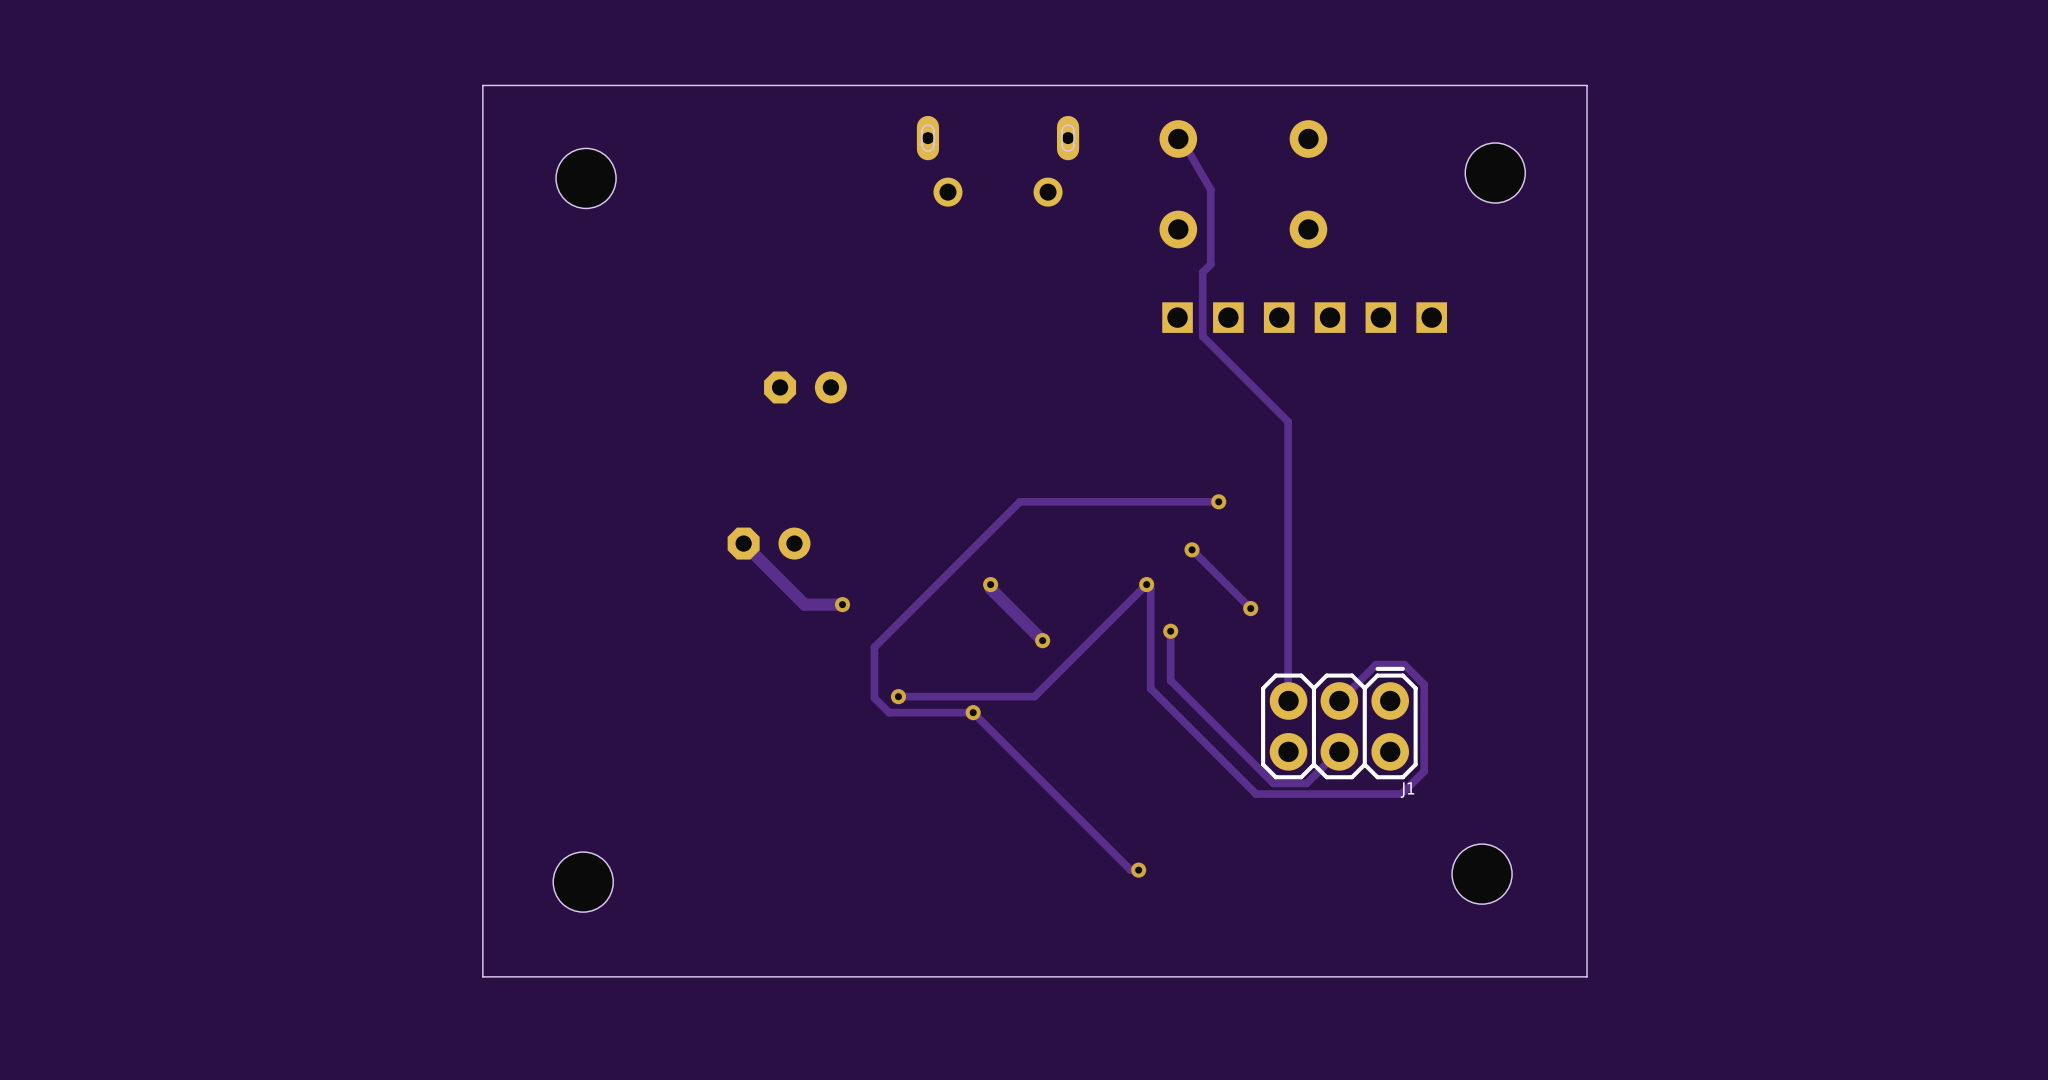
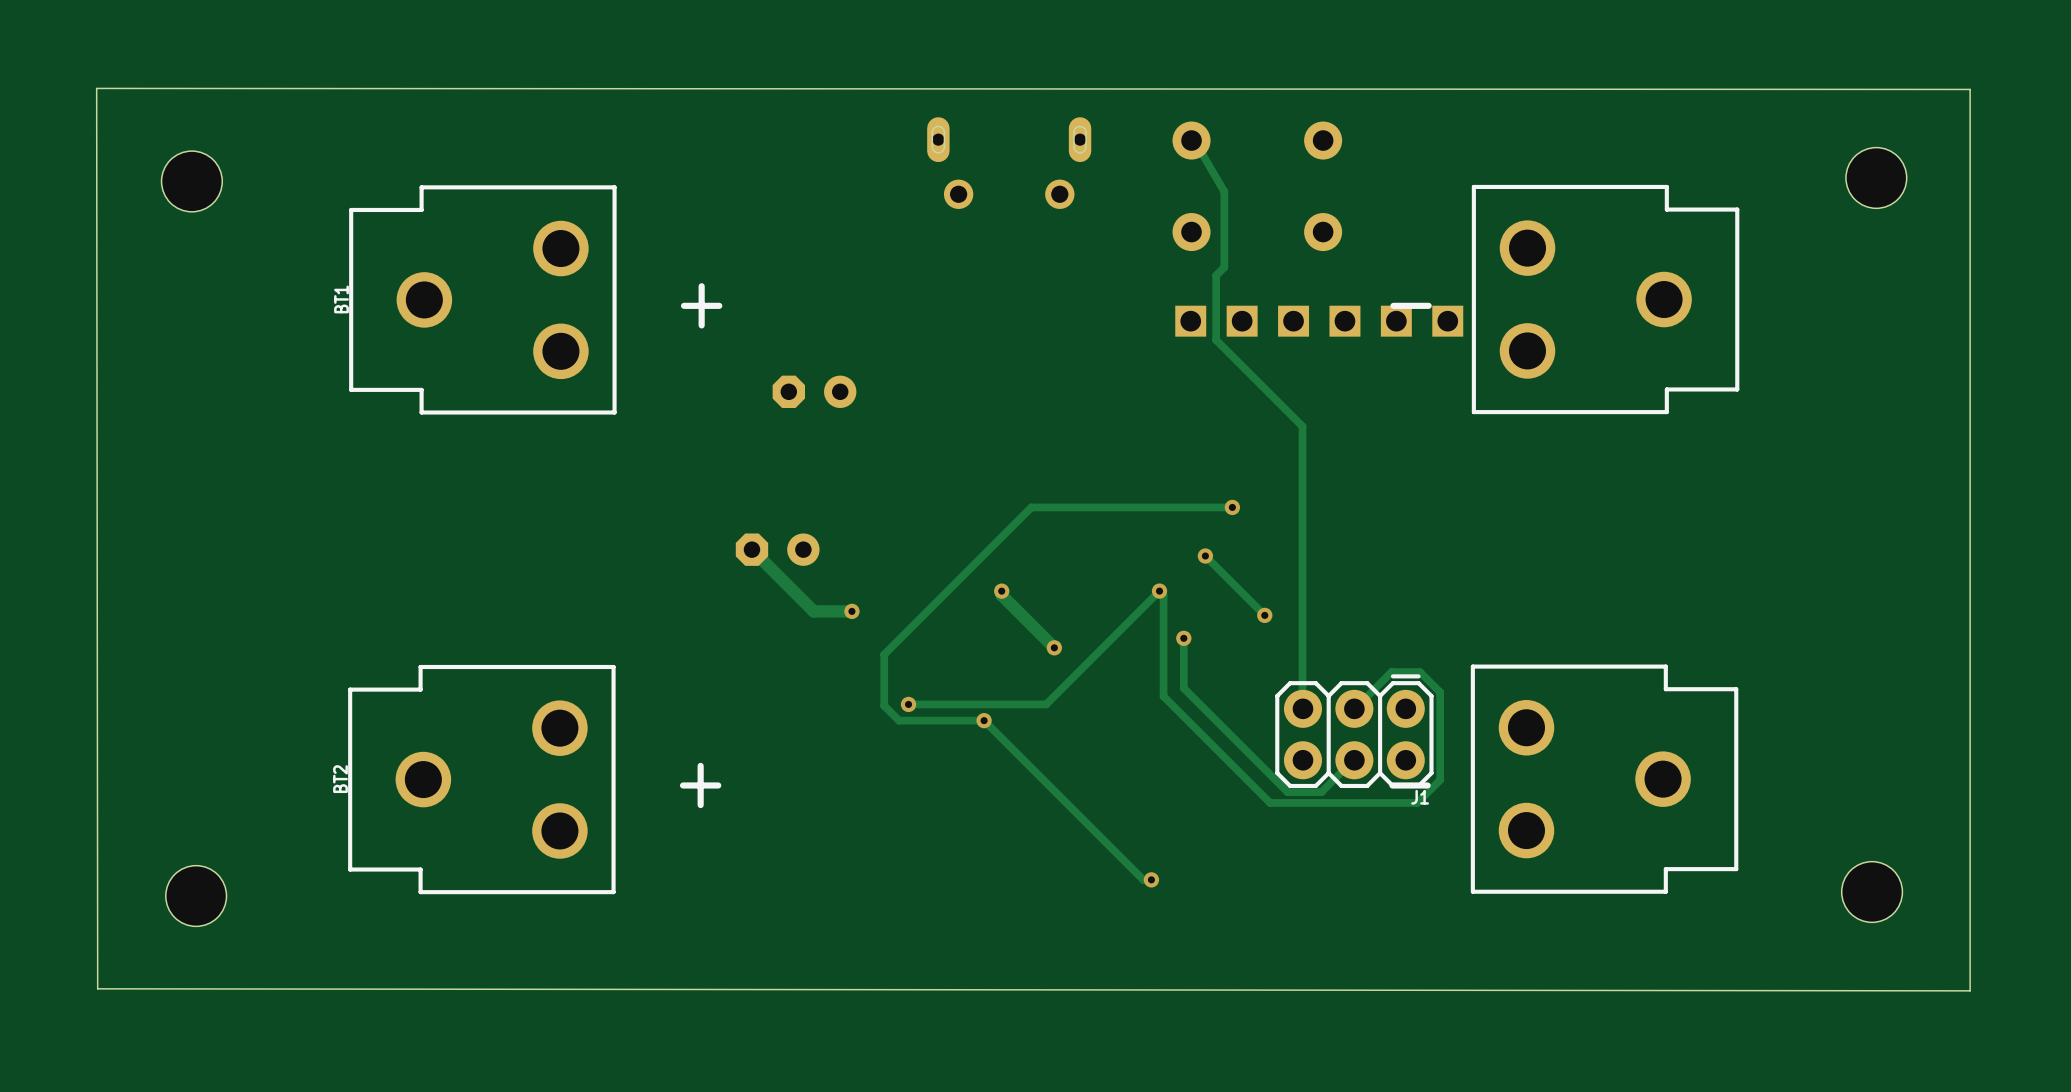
board edge: (1587, 85) (482, 85) (482, 976) (1587, 976) (1587, 85) -> (96, 88) (1970, 89) (1970, 990) (97, 988) (96, 88)
part position: (1495, 172) -> (1876, 177)
part position: (586, 178) -> (191, 181)
BT1: none -> (1044, 299)
BT2: none -> (1043, 779)
part position: (1482, 874) -> (1872, 892)
part position: (583, 882) -> (196, 896)

